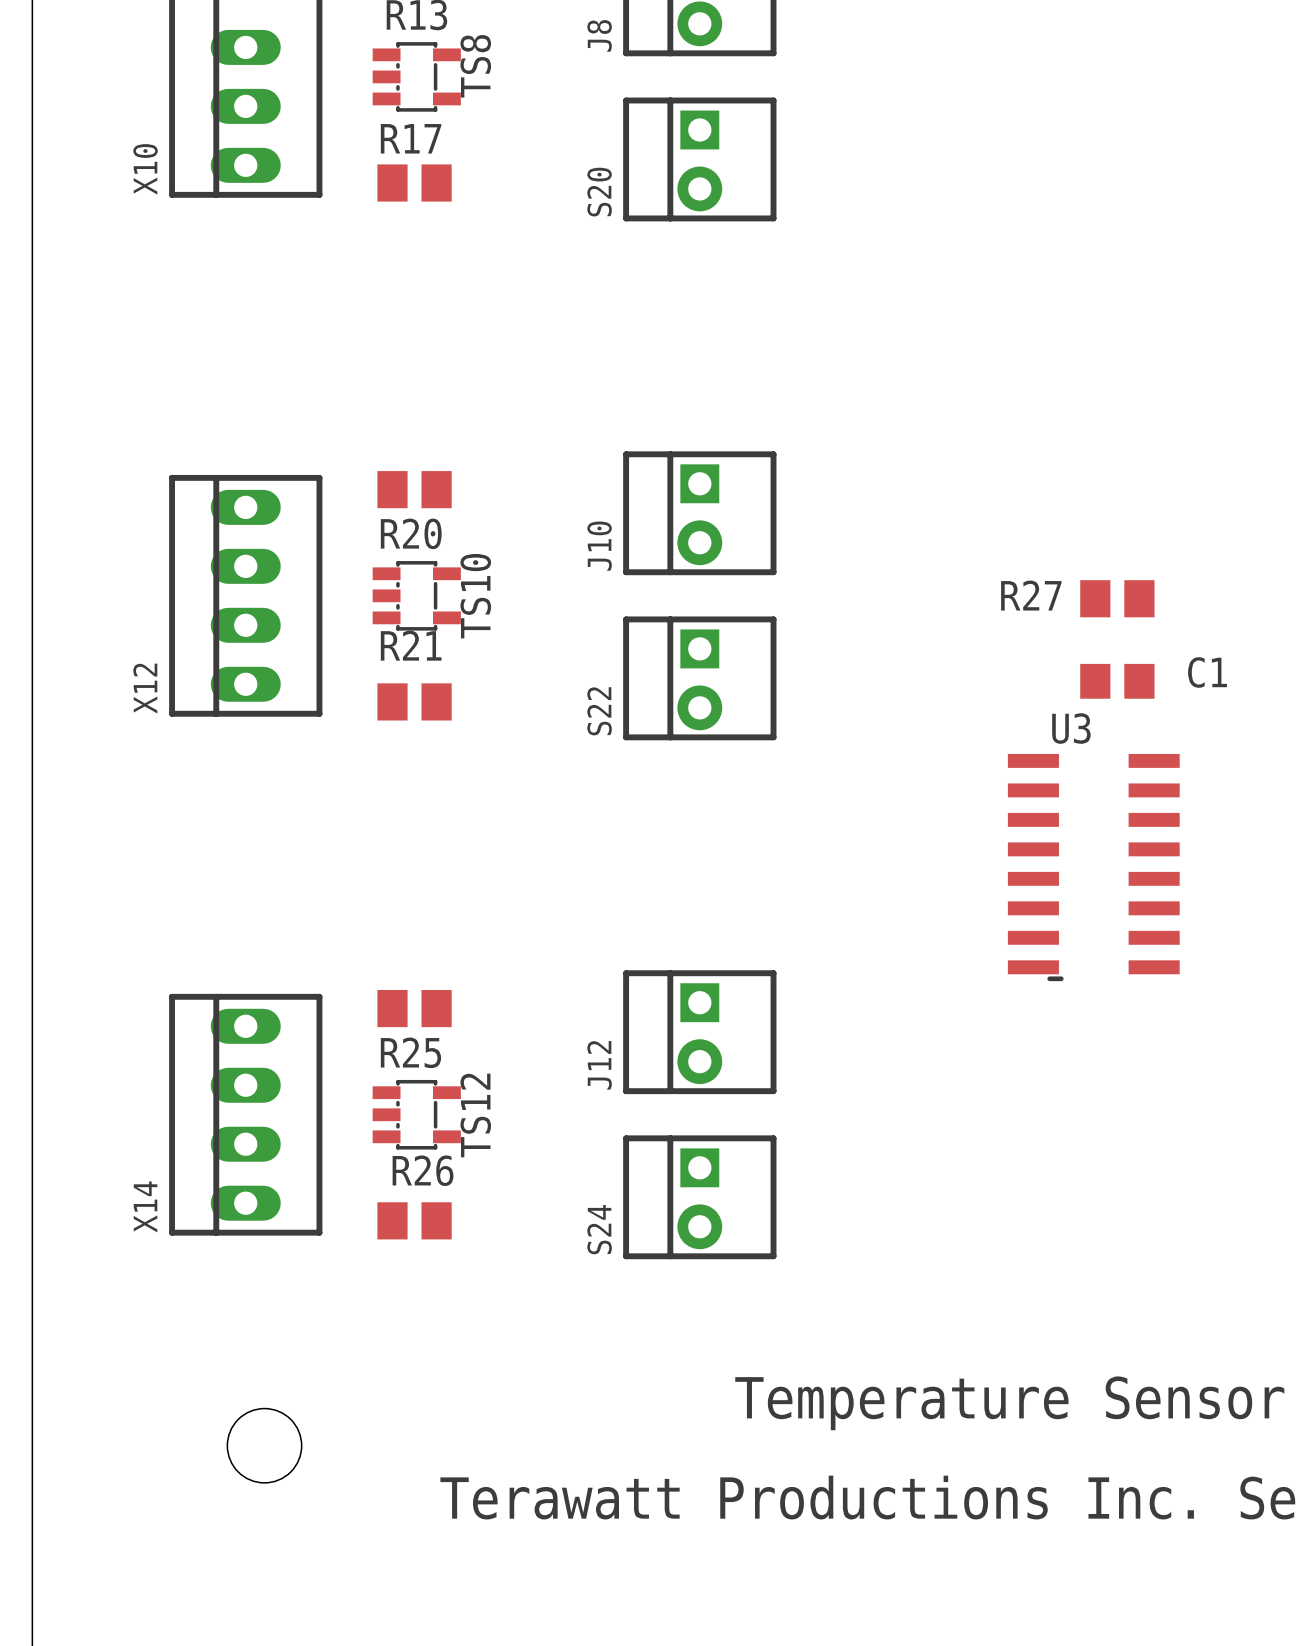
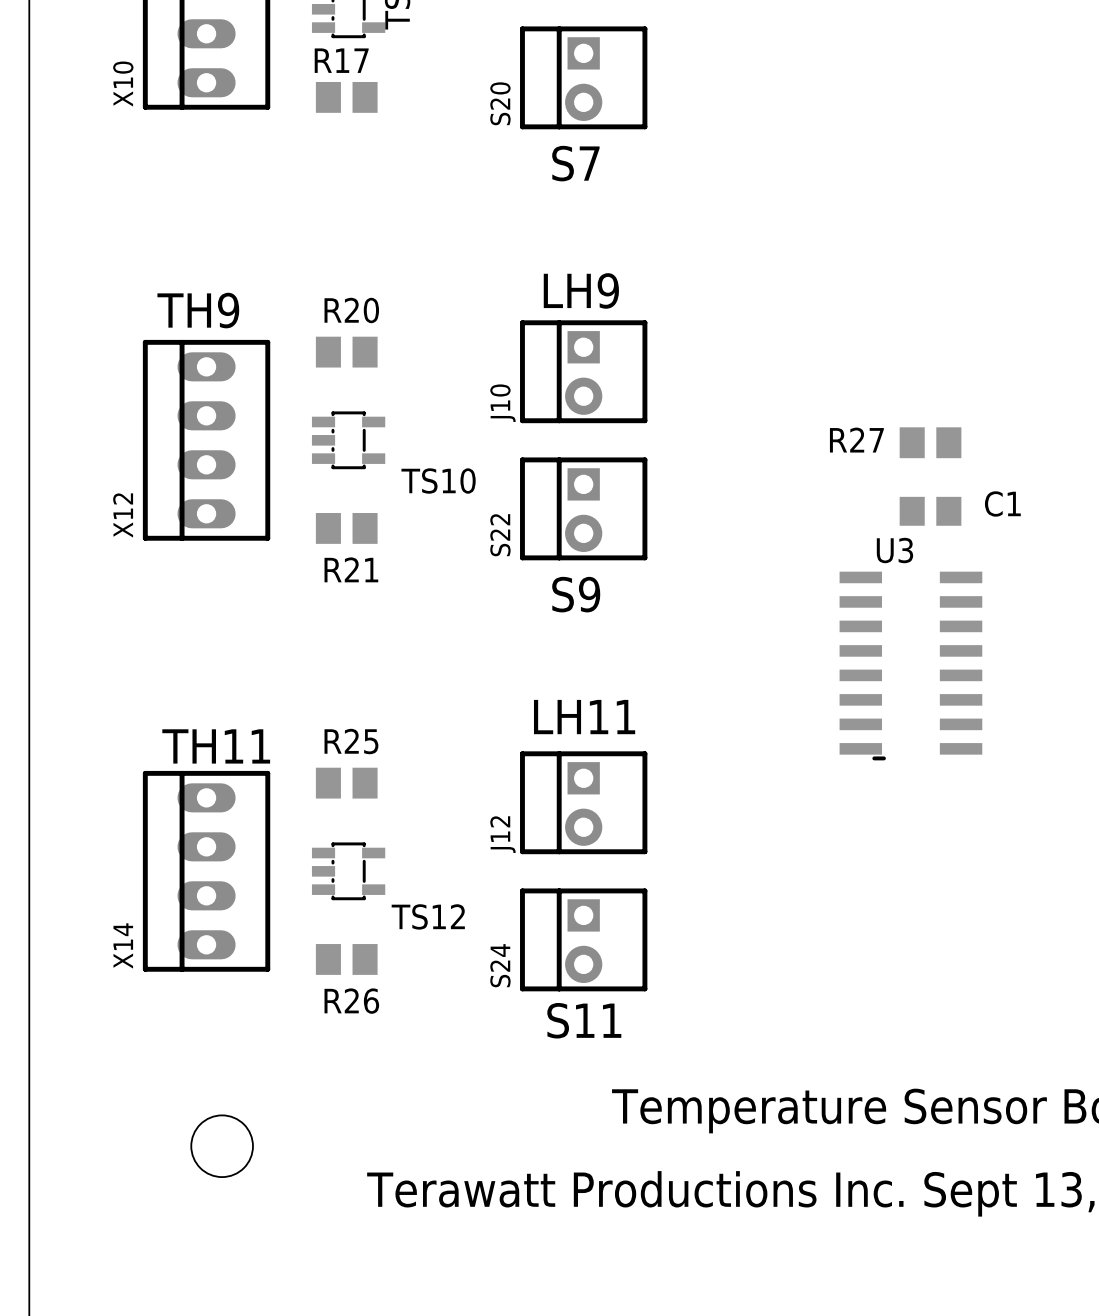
text: none -> S7 (575, 163)
text: none -> LH9 (581, 290)
text: none -> TH9 (198, 310)
R20 name position: R20 (411, 533) -> R20 (351, 310)
TS10 name rotation: 0° (475, 596) -> 90° clockwise (438, 481)
R21 name position: R21 (411, 645) -> R21 (351, 569)
text: none -> S9 (576, 594)
text: none -> LH11 (584, 717)
text: none -> TH11 (216, 746)
R25 name position: R25 (410, 1052) -> R25 (351, 741)
TS12 name rotation: 0° (475, 1115) -> 90° clockwise (428, 916)
R26 name position: R26 (423, 1170) -> R26 (351, 1001)
text: none -> S11 (584, 1020)

